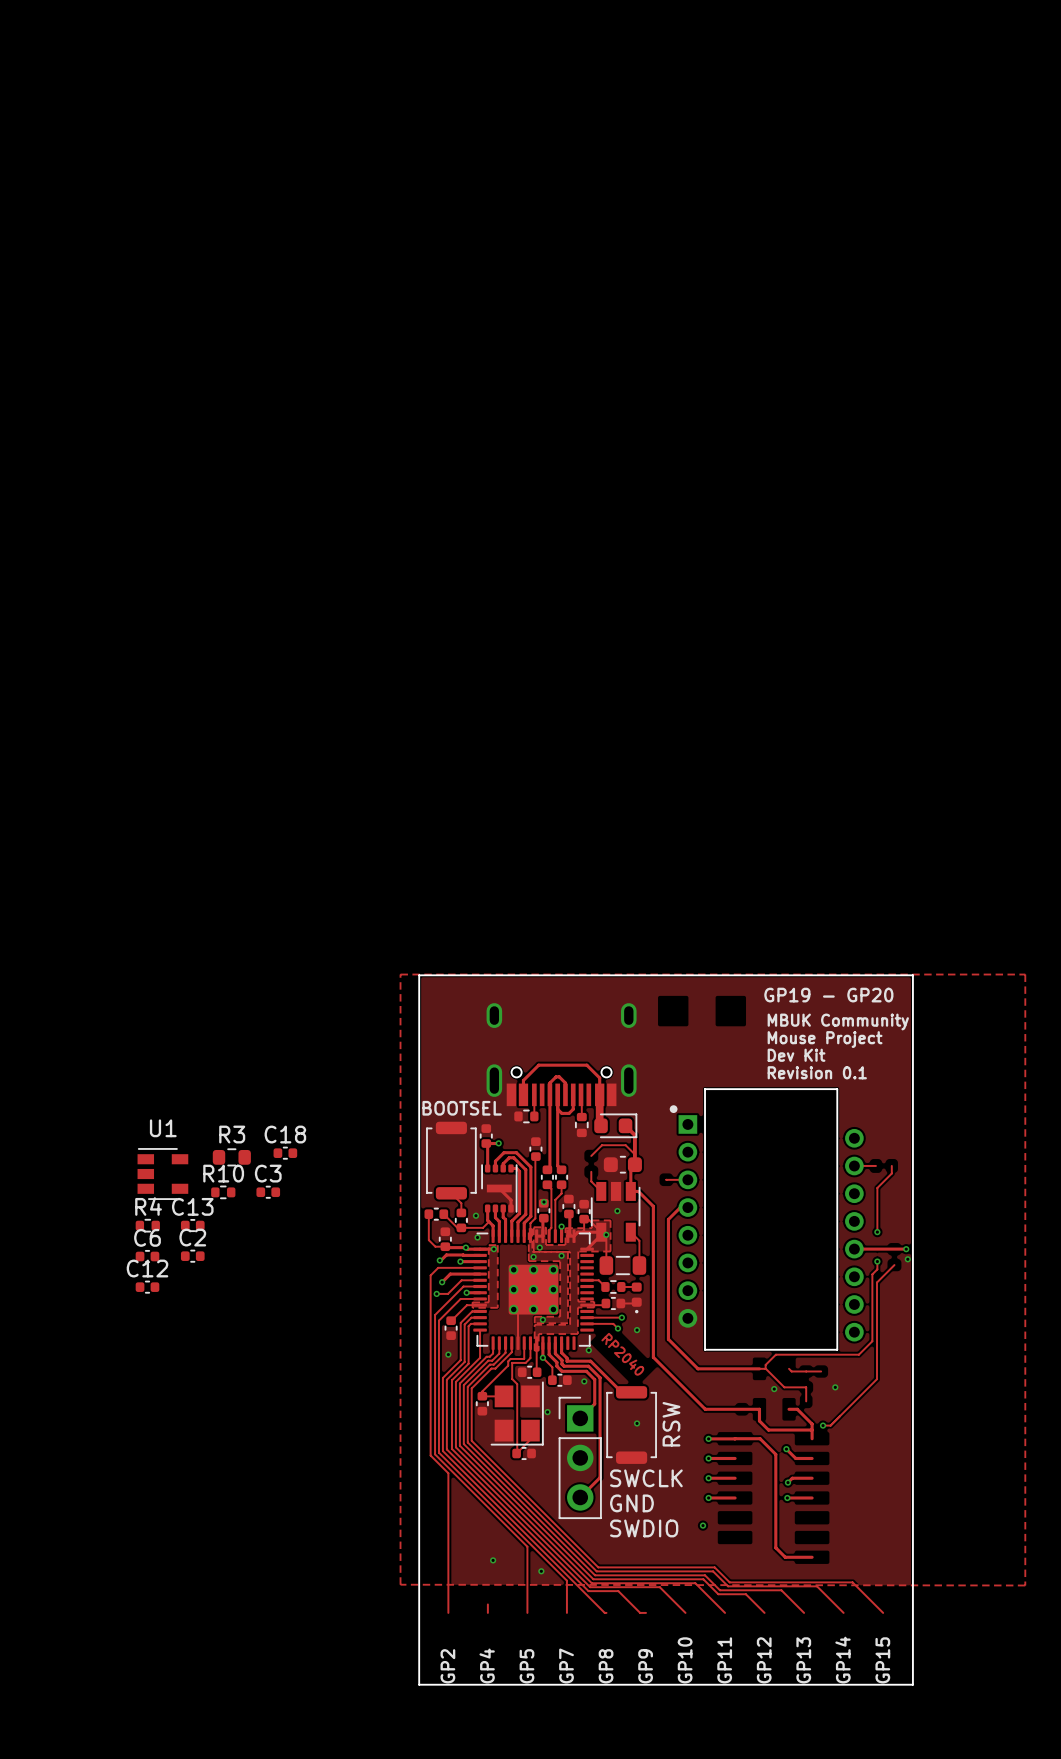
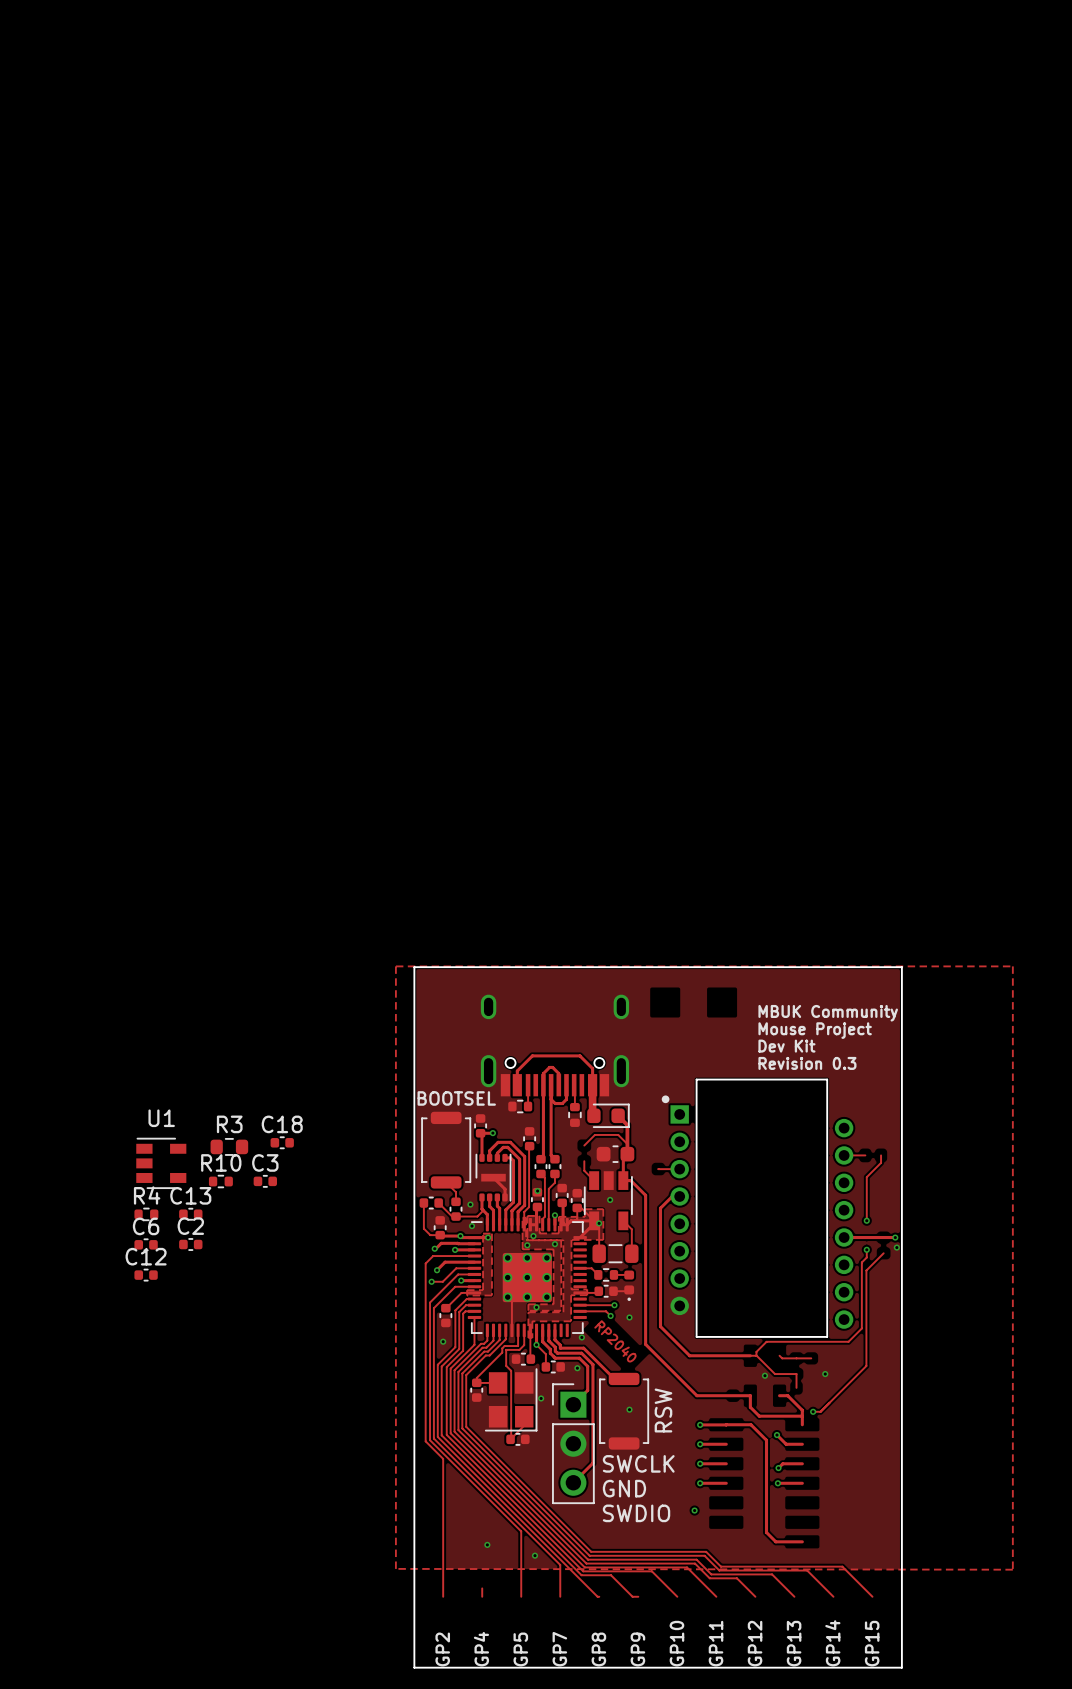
text: GP19 - GP20 (828, 995) -> none
text: Revision 0.1 (817, 1072) -> Revision 0.3 (807, 1063)

